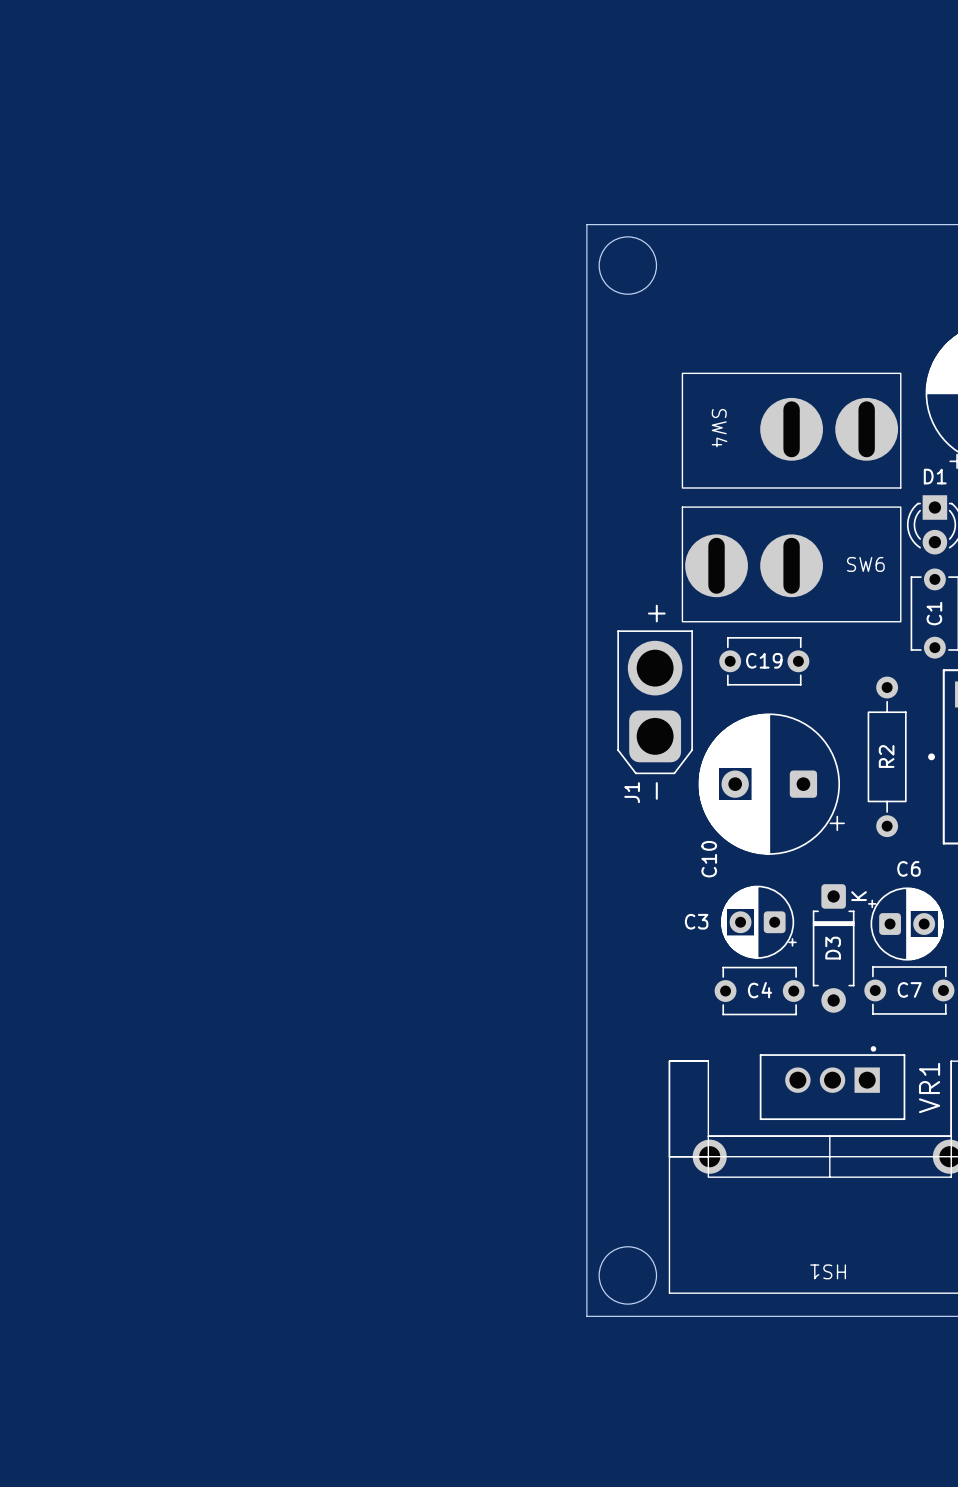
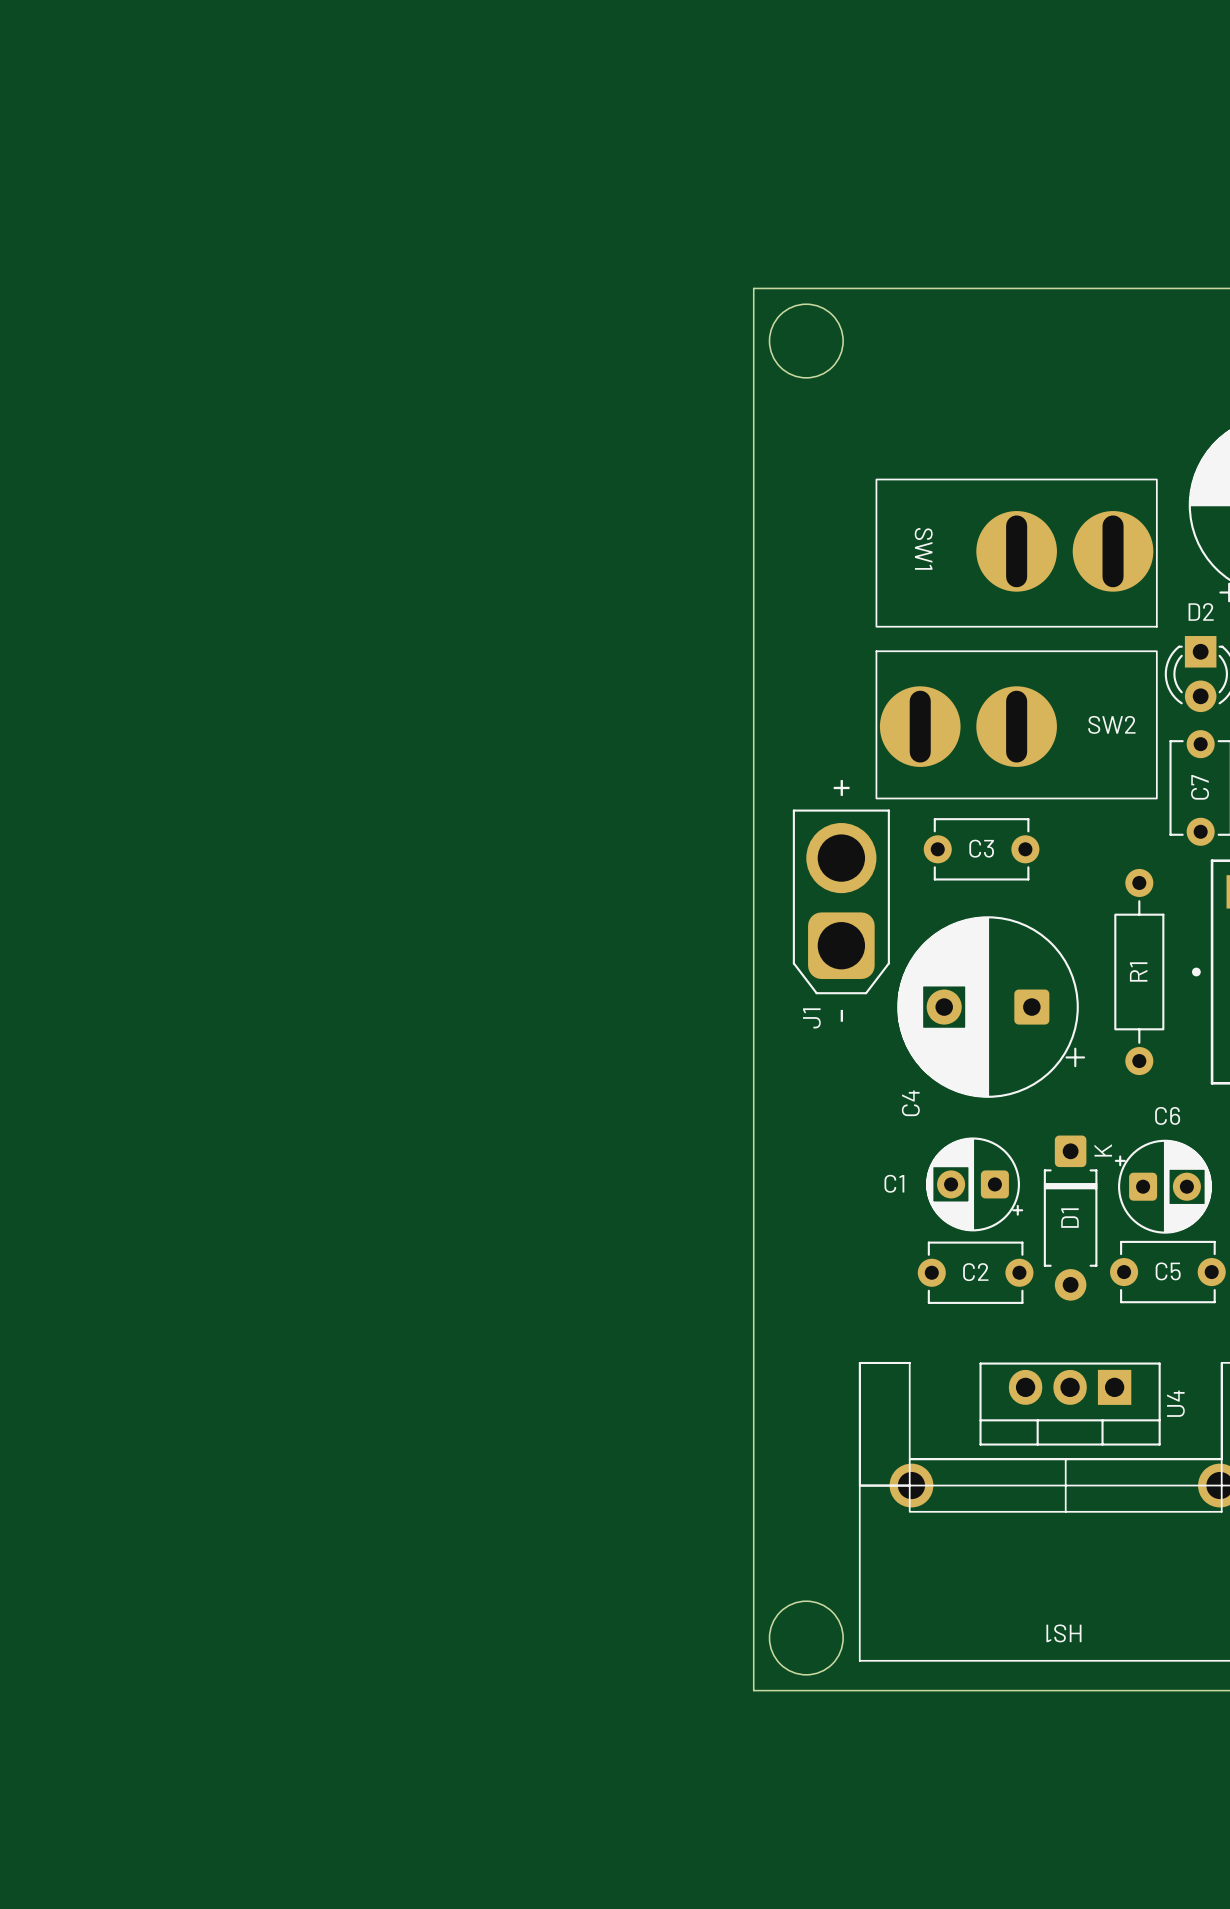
SW4 name: SW4 (719, 428) -> SW1 (923, 548)
D1 name: D1 (935, 476) -> D2 (1201, 611)
SW6 name: SW6 (865, 564) -> SW2 (1111, 724)
C1 name: C1 (934, 613) -> C7 (1200, 787)
C19 name: C19 (764, 660) -> C3 (981, 848)
R2 name: R2 (886, 756) -> R1 (1138, 971)
C10 name: C10 (709, 859) -> C4 (910, 1103)
C3 name: C3 (696, 921) -> C1 (894, 1183)
D3 name: D3 (833, 948) -> D1 (1069, 1218)
C7 name: C7 (909, 989) -> C5 (1168, 1271)
C4 name: C4 (759, 990) -> C2 (975, 1272)
VR1: (832, 1083) -> none
U4: none -> (1070, 1404)

